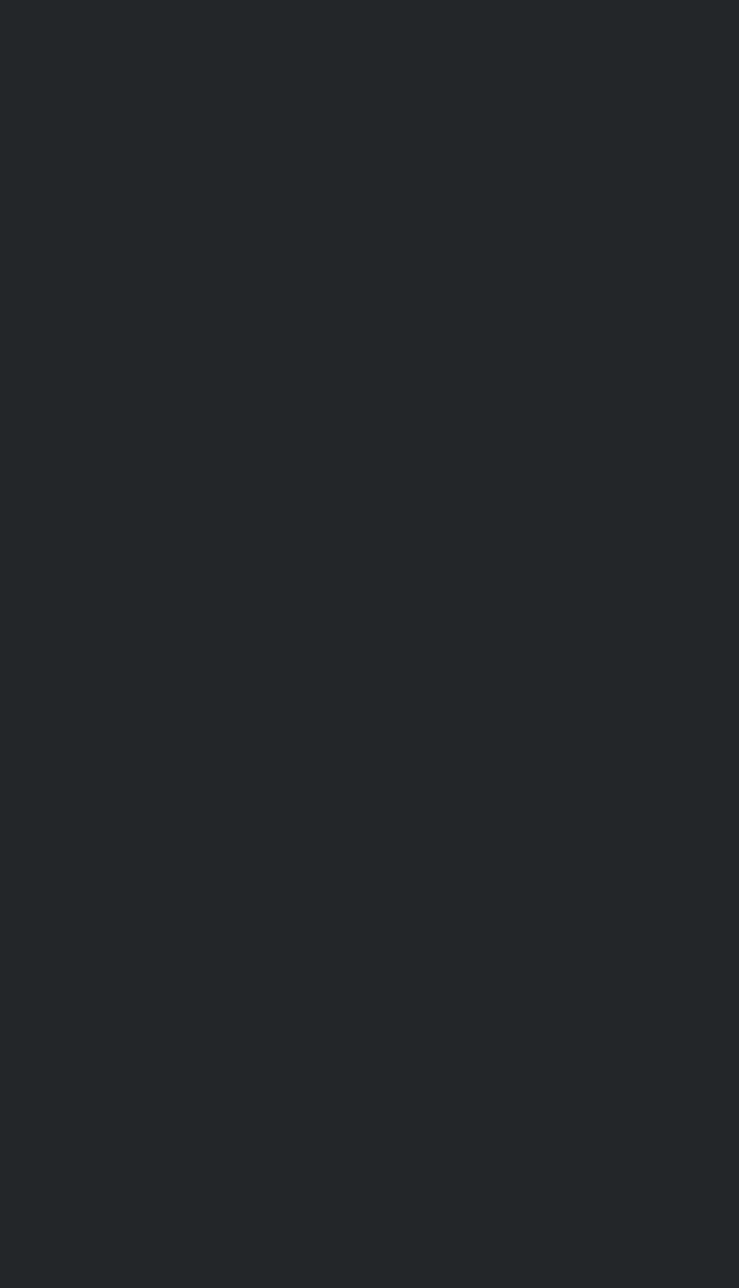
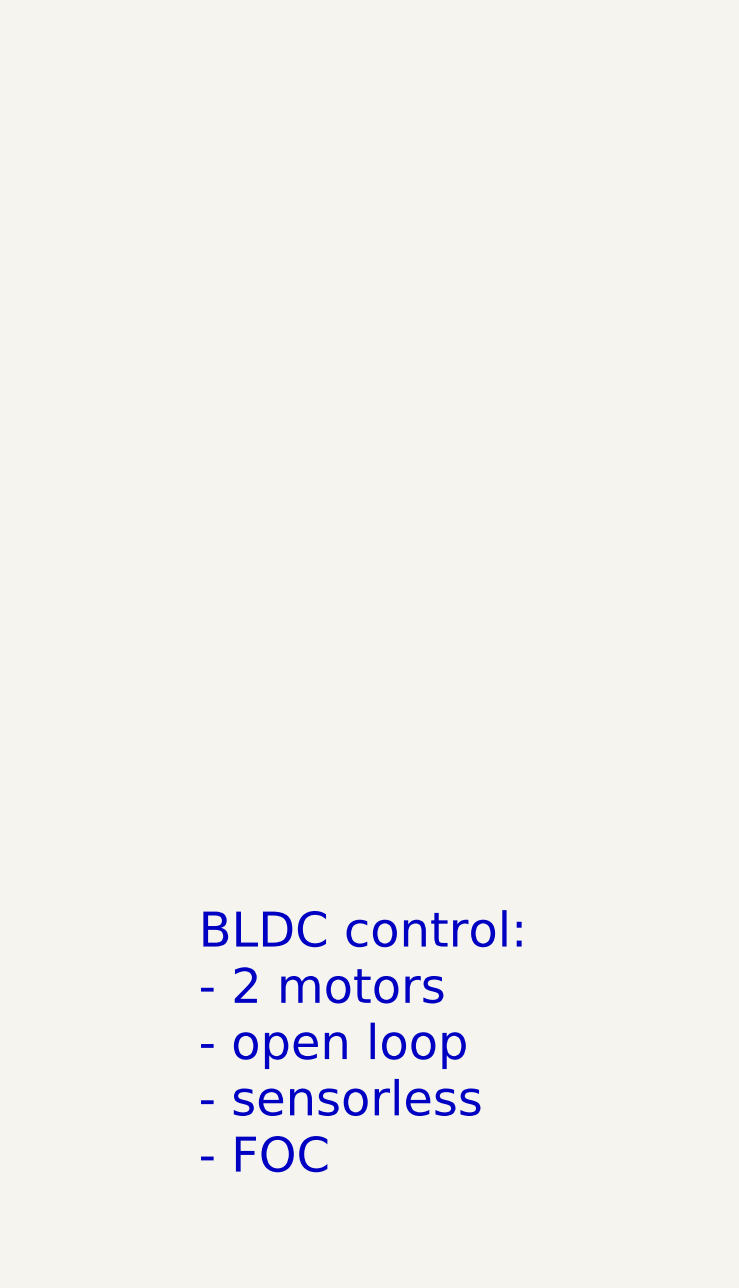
text: none -> BLDC control: (362, 928)
text: none -> - 2 motors (322, 985)
text: none -> - open loop (333, 1045)
text: none -> - sensorless (340, 1097)
text: none -> - FOC (264, 1154)

